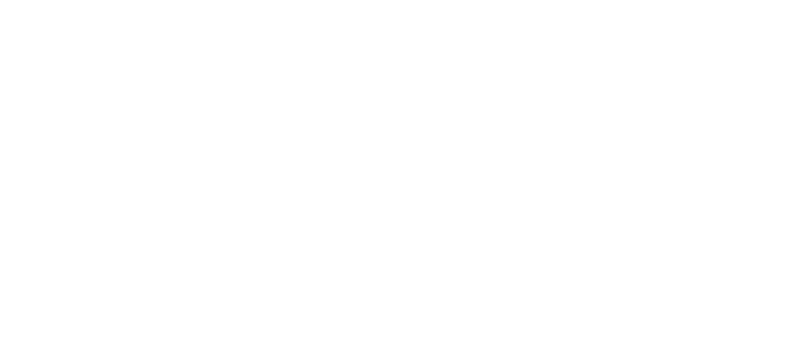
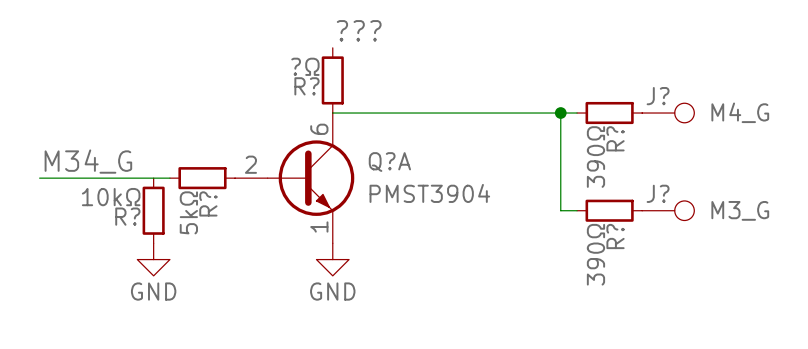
label: none -> ??? (359, 30)
R?: none -> ?Ω (332, 80)
wire: none -> (332, 113) (577, 113)
wire: none -> (560, 113) (560, 210) (577, 210)
junction: none -> (560, 113)
R?: none -> 390Ω (609, 113)
J?: none -> M4_G (668, 113)
label: none -> M34_G (88, 161)
wire: none -> (39, 178) (169, 178)
R?: none -> 5kΩ (202, 178)
Q?A: none -> PMST3904 (294, 178)
R?: none -> 10kΩ (153, 210)
R?: none -> 390Ω (609, 210)
J?: none -> M3_G (668, 210)
power symbol: none -> GND (153, 259)
power symbol: none -> GND (332, 259)

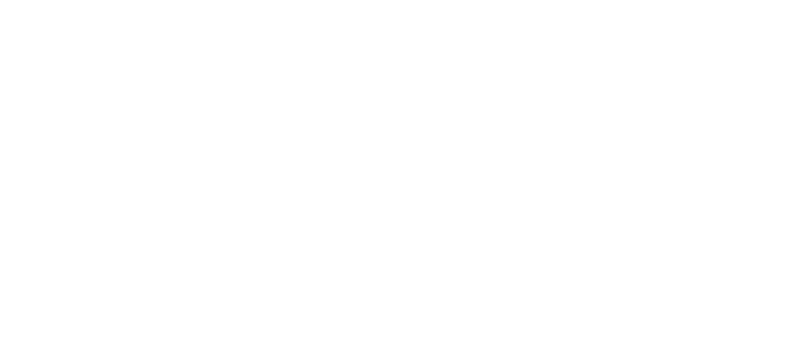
label: ??? (359, 30) -> none
R?: ?Ω (332, 80) -> none
wire: (332, 113) (577, 113) -> none
wire: (560, 113) (560, 210) (577, 210) -> none
junction: (560, 113) -> none
R?: 390Ω (609, 113) -> none
J?: M4_G (668, 113) -> none
label: M34_G (88, 161) -> none
wire: (39, 178) (169, 178) -> none
R?: 5kΩ (202, 178) -> none
Q?A: PMST3904 (294, 178) -> none
R?: 10kΩ (153, 210) -> none
R?: 390Ω (609, 210) -> none
J?: M3_G (668, 210) -> none
power symbol: GND (153, 259) -> none
power symbol: GND (332, 259) -> none

